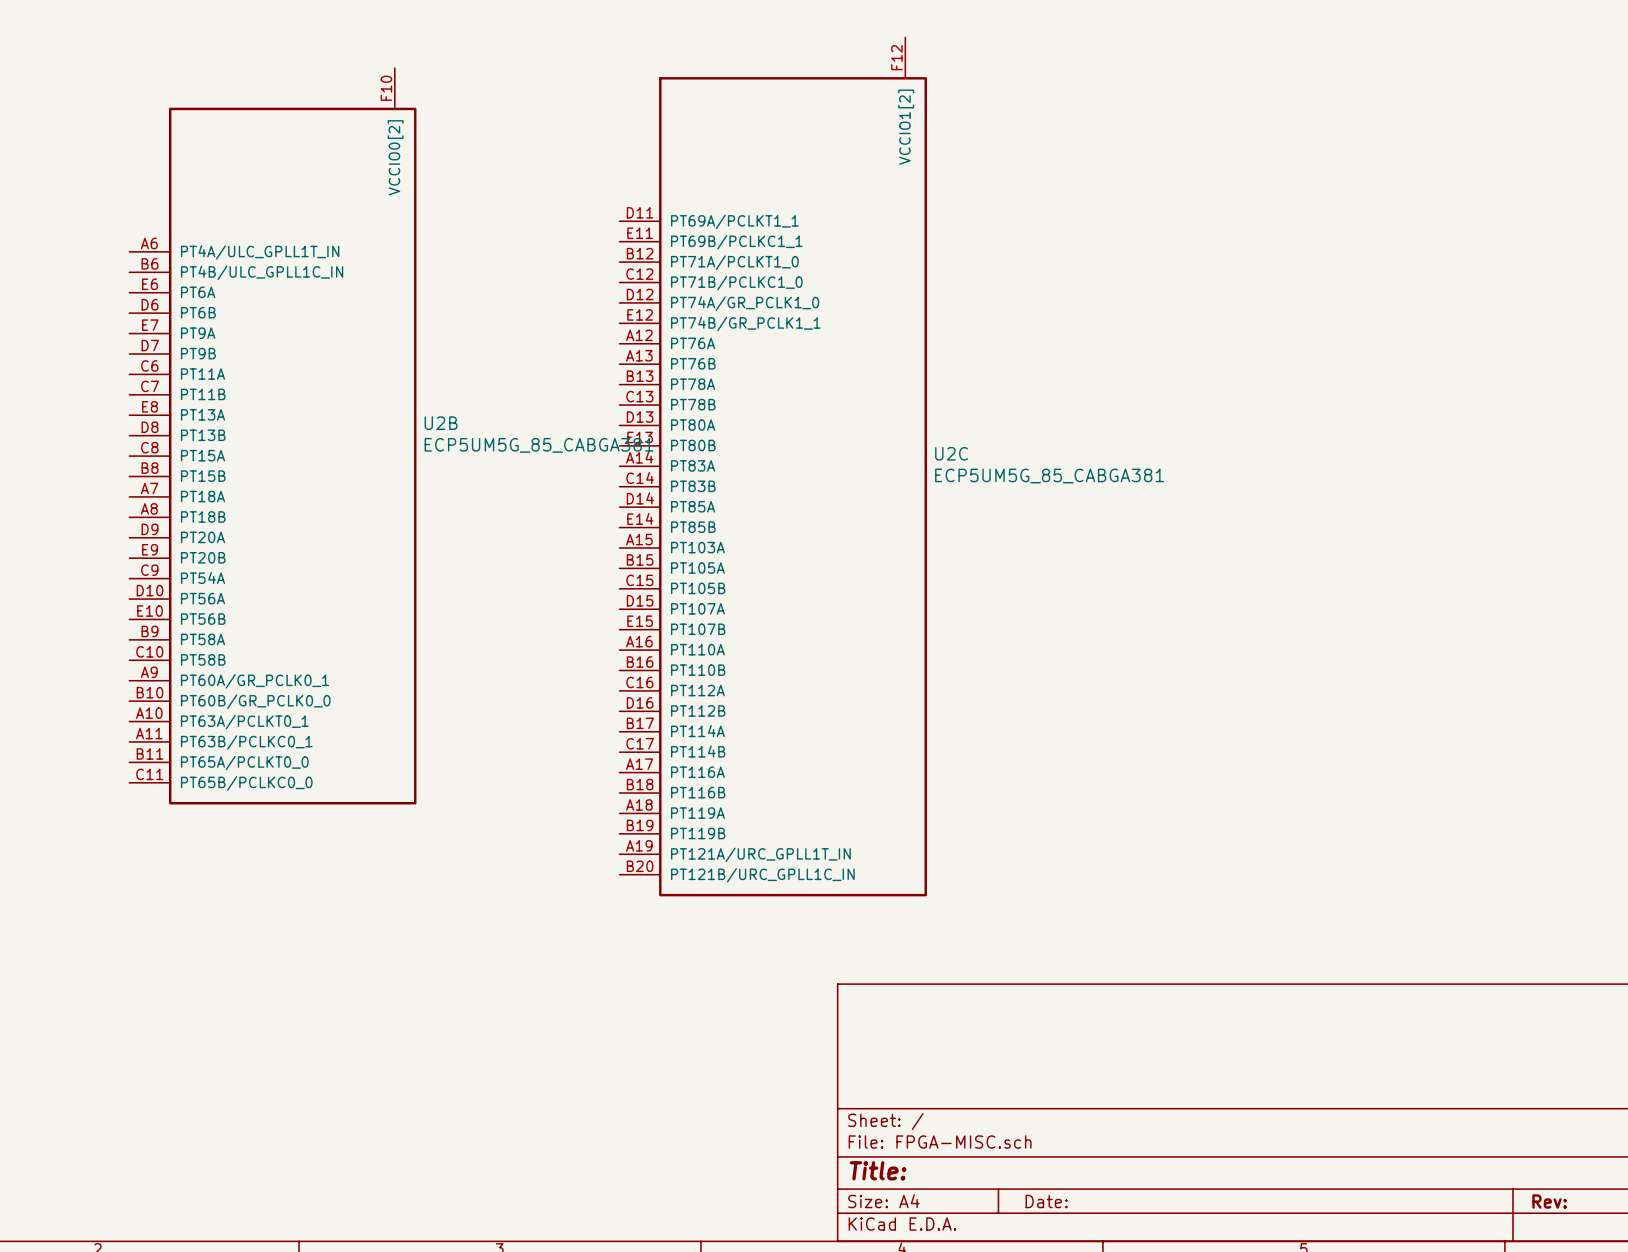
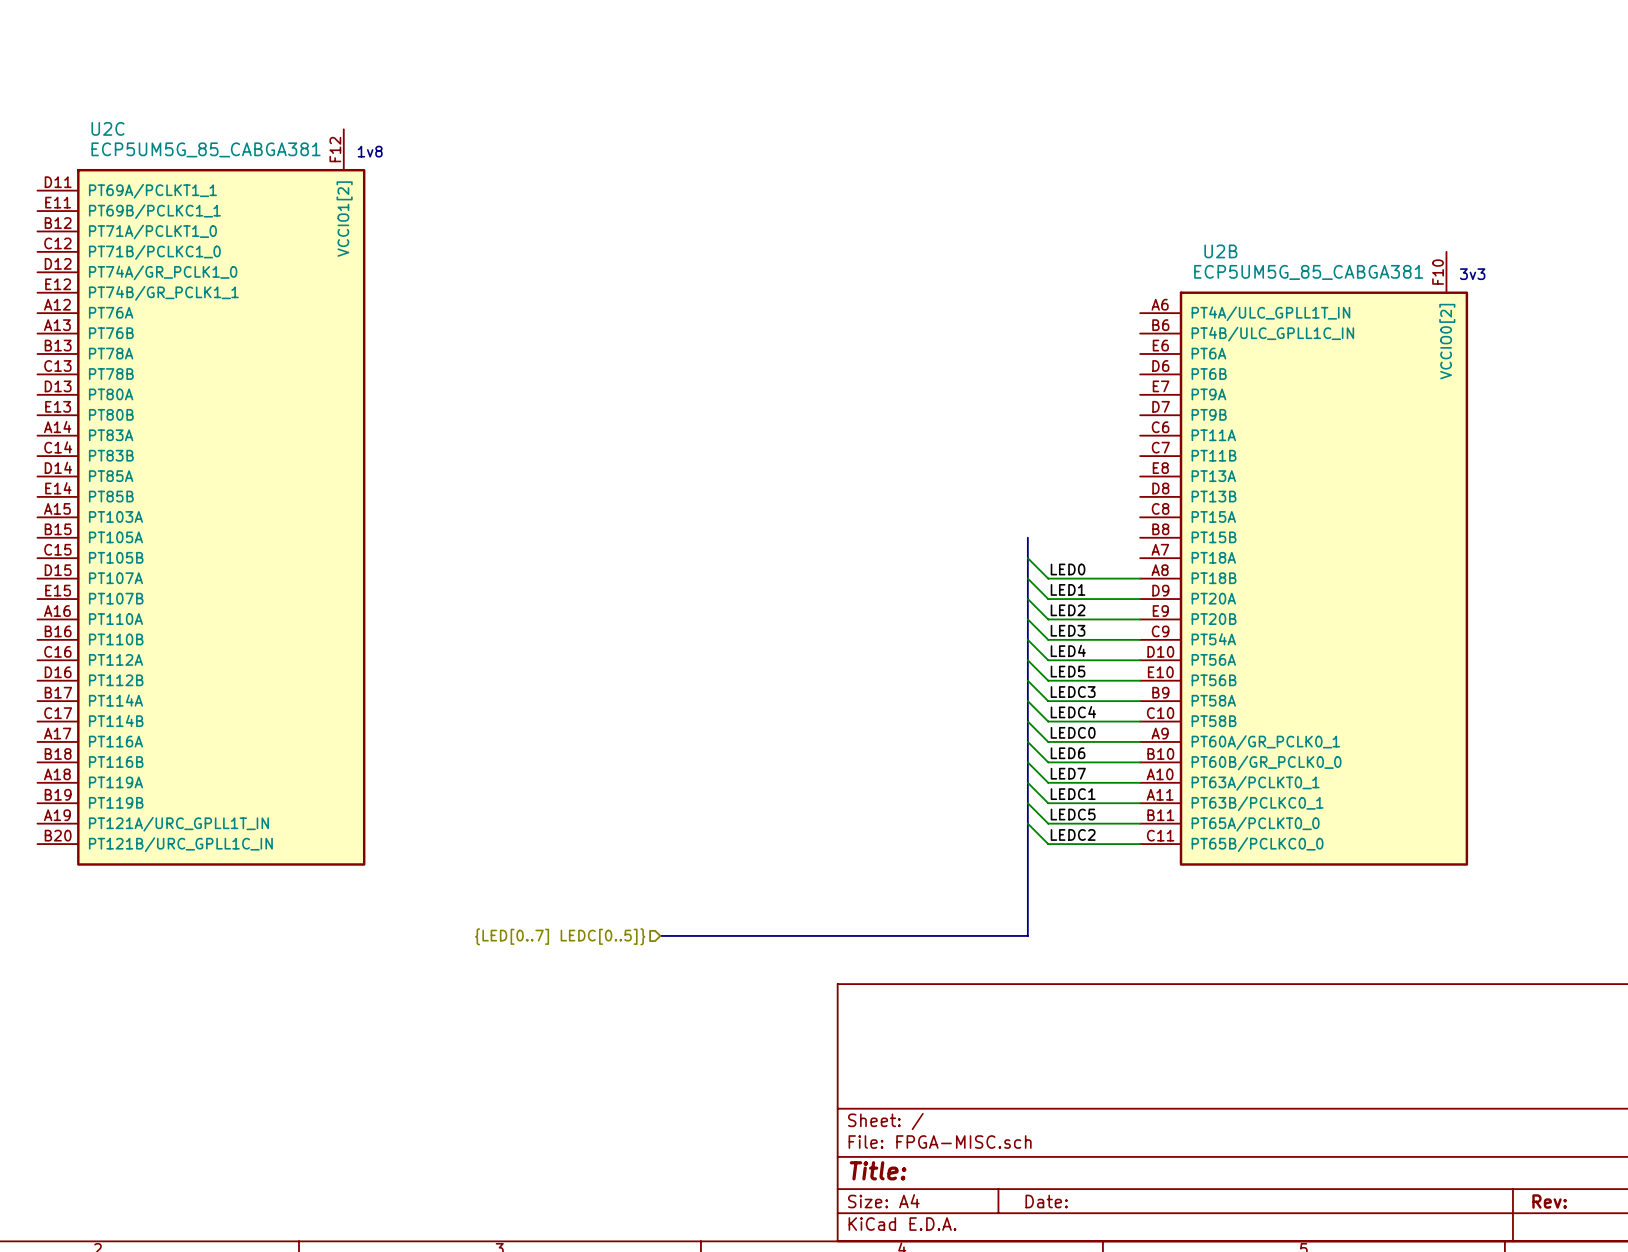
U2C symbol: [619, 37, 927, 897] -> [37, 129, 366, 866]
U2B symbol: [129, 68, 417, 805] -> [1140, 251, 1469, 866]
text: none -> 1v8 (370, 151)
text: none -> 3v3 (1472, 274)
U2B name position: U2B (441, 423) -> U2B (1220, 251)
U2B value position: ECP5UM5G_85_CABGA381 (539, 445) -> ECP5UM5G_85_CABGA381 (1308, 272)
U2C name position: U2C (951, 453) -> U2C (108, 128)
U2C value position: ECP5UM5G_85_CABGA381 (1049, 476) -> ECP5UM5G_85_CABGA381 (206, 149)
bus: none -> (1027, 537) (1027, 935) (660, 935)
wire: none -> (1027, 558) (1048, 578) (1140, 578)
label: none -> LED0 (1068, 569)
wire: none -> (1027, 578) (1048, 599) (1140, 599)
label: none -> LED1 (1068, 589)
wire: none -> (1027, 599) (1048, 619) (1140, 619)
label: none -> LED2 (1068, 610)
wire: none -> (1027, 619) (1048, 639) (1140, 639)
label: none -> LED3 (1068, 630)
wire: none -> (1027, 639) (1048, 660) (1140, 660)
label: none -> LED4 (1068, 650)
wire: none -> (1027, 660) (1048, 680) (1140, 680)
label: none -> LED5 (1068, 671)
wire: none -> (1027, 680) (1048, 701) (1140, 701)
label: none -> LEDC3 (1073, 692)
wire: none -> (1027, 701) (1048, 721) (1140, 721)
label: none -> LEDC4 (1073, 712)
wire: none -> (1027, 721) (1048, 741) (1140, 741)
label: none -> LEDC0 (1073, 732)
wire: none -> (1027, 741) (1048, 762) (1140, 762)
label: none -> LED6 (1068, 753)
wire: none -> (1027, 762) (1048, 782) (1140, 782)
label: none -> LED7 (1068, 773)
wire: none -> (1027, 782) (1048, 803) (1140, 803)
label: none -> LEDC1 (1073, 794)
wire: none -> (1027, 803) (1048, 823) (1140, 823)
label: none -> LEDC5 (1073, 814)
wire: none -> (1027, 823) (1048, 844) (1140, 844)
label: none -> LEDC2 (1073, 834)
hierarchical label: none -> {LED[0..7] LEDC[0..5]} (560, 936)

